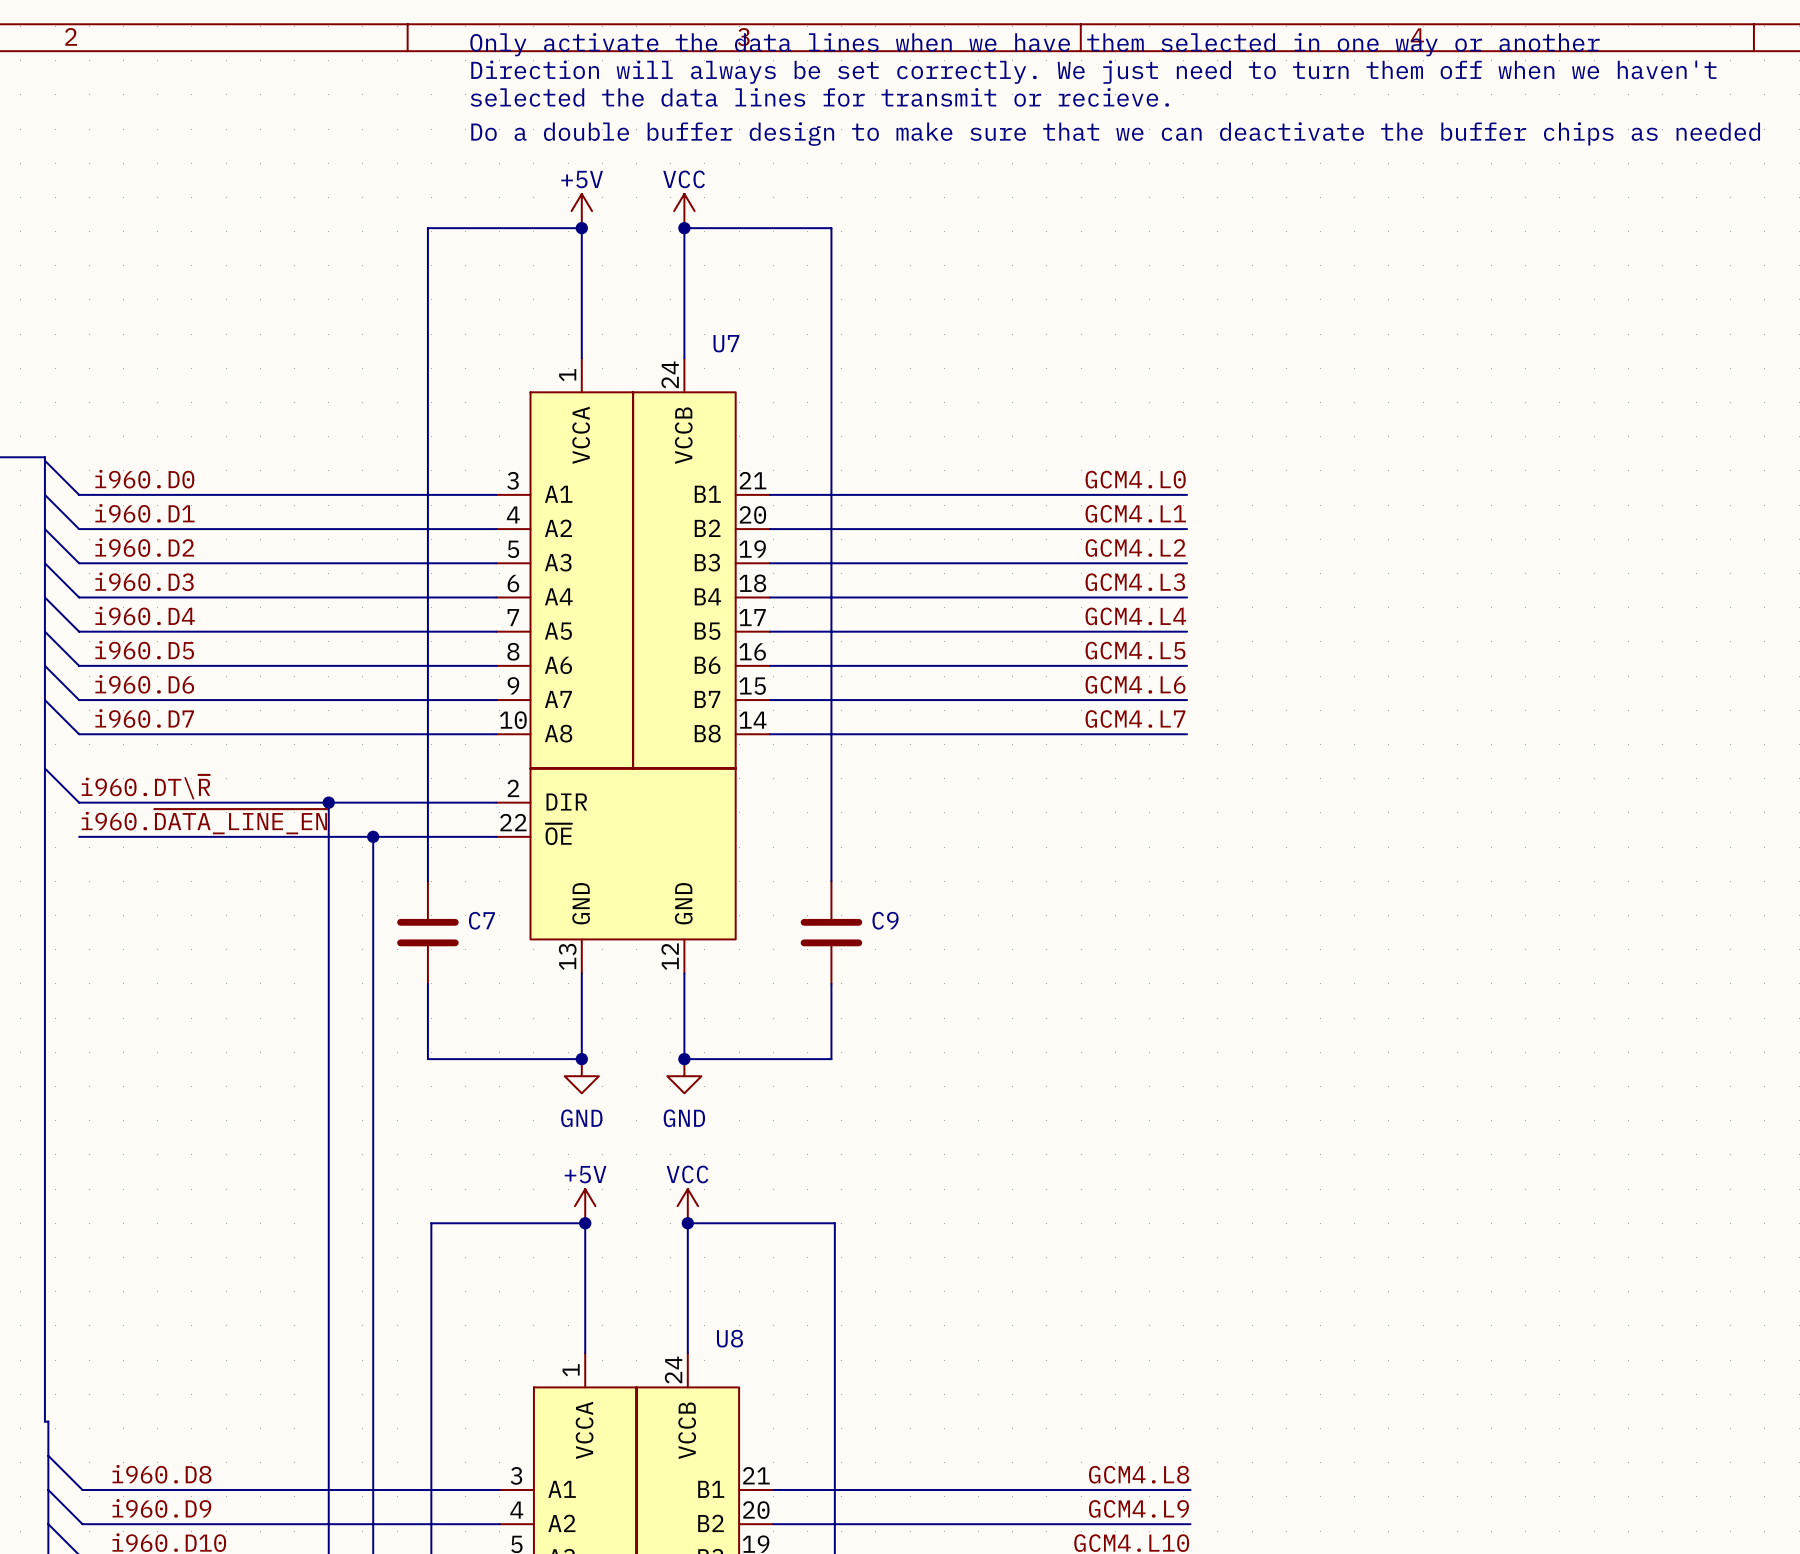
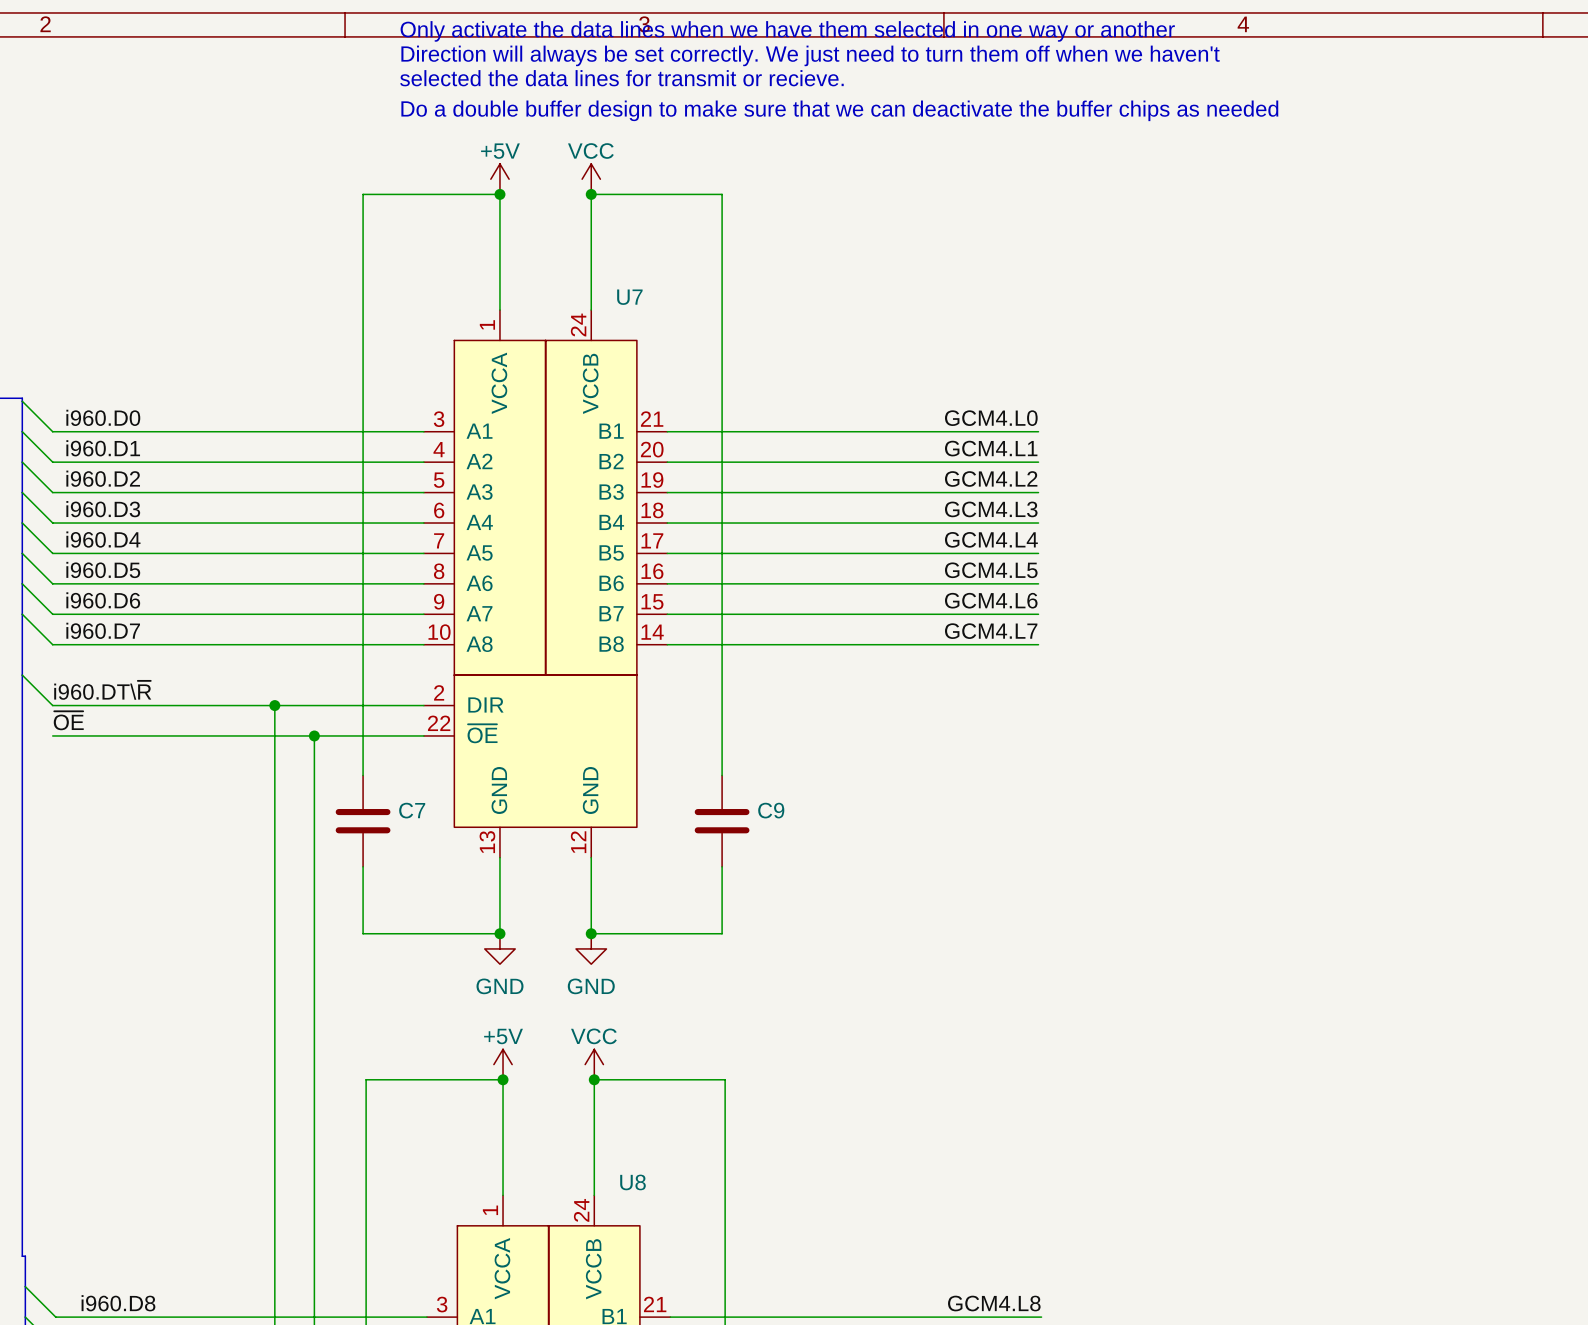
label: i960.~{DATA_LINE_EN} (204, 821) -> ~{OE} (68, 720)

